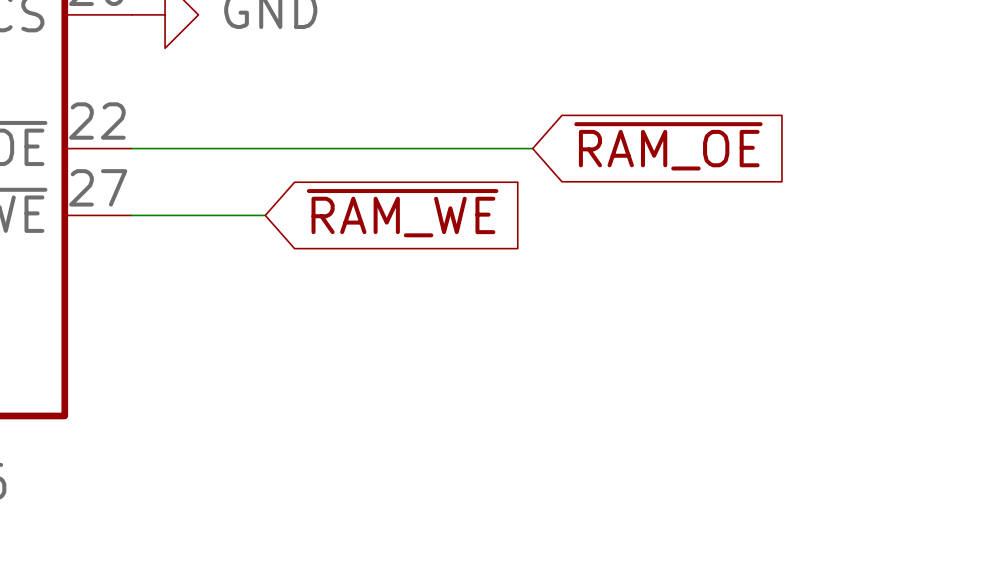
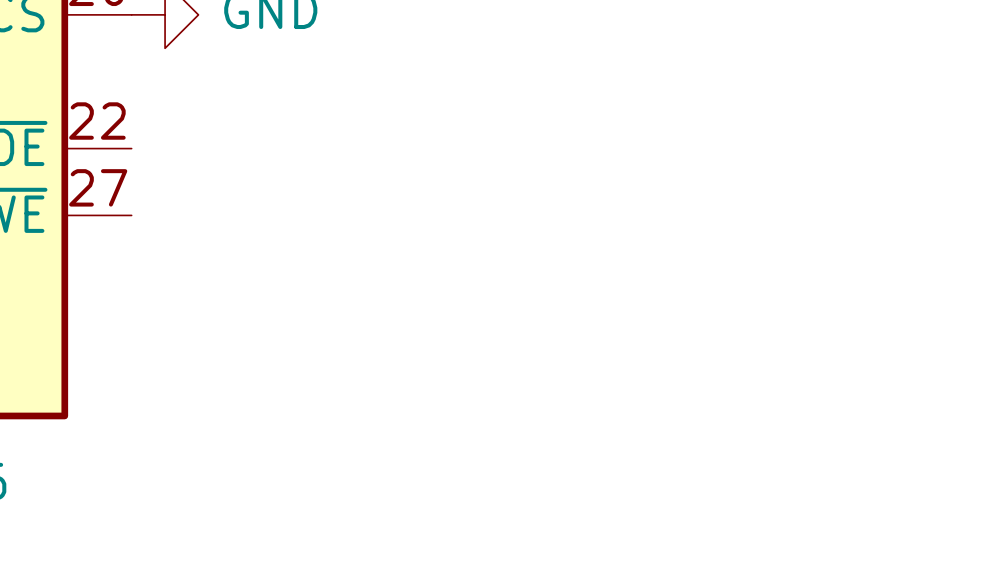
global label: ~{RAM_OE} (668, 146) -> none
wire: (131, 148) (532, 148) -> none
global label: ~{RAM_WE} (402, 213) -> none
wire: (131, 215) (265, 215) -> none

